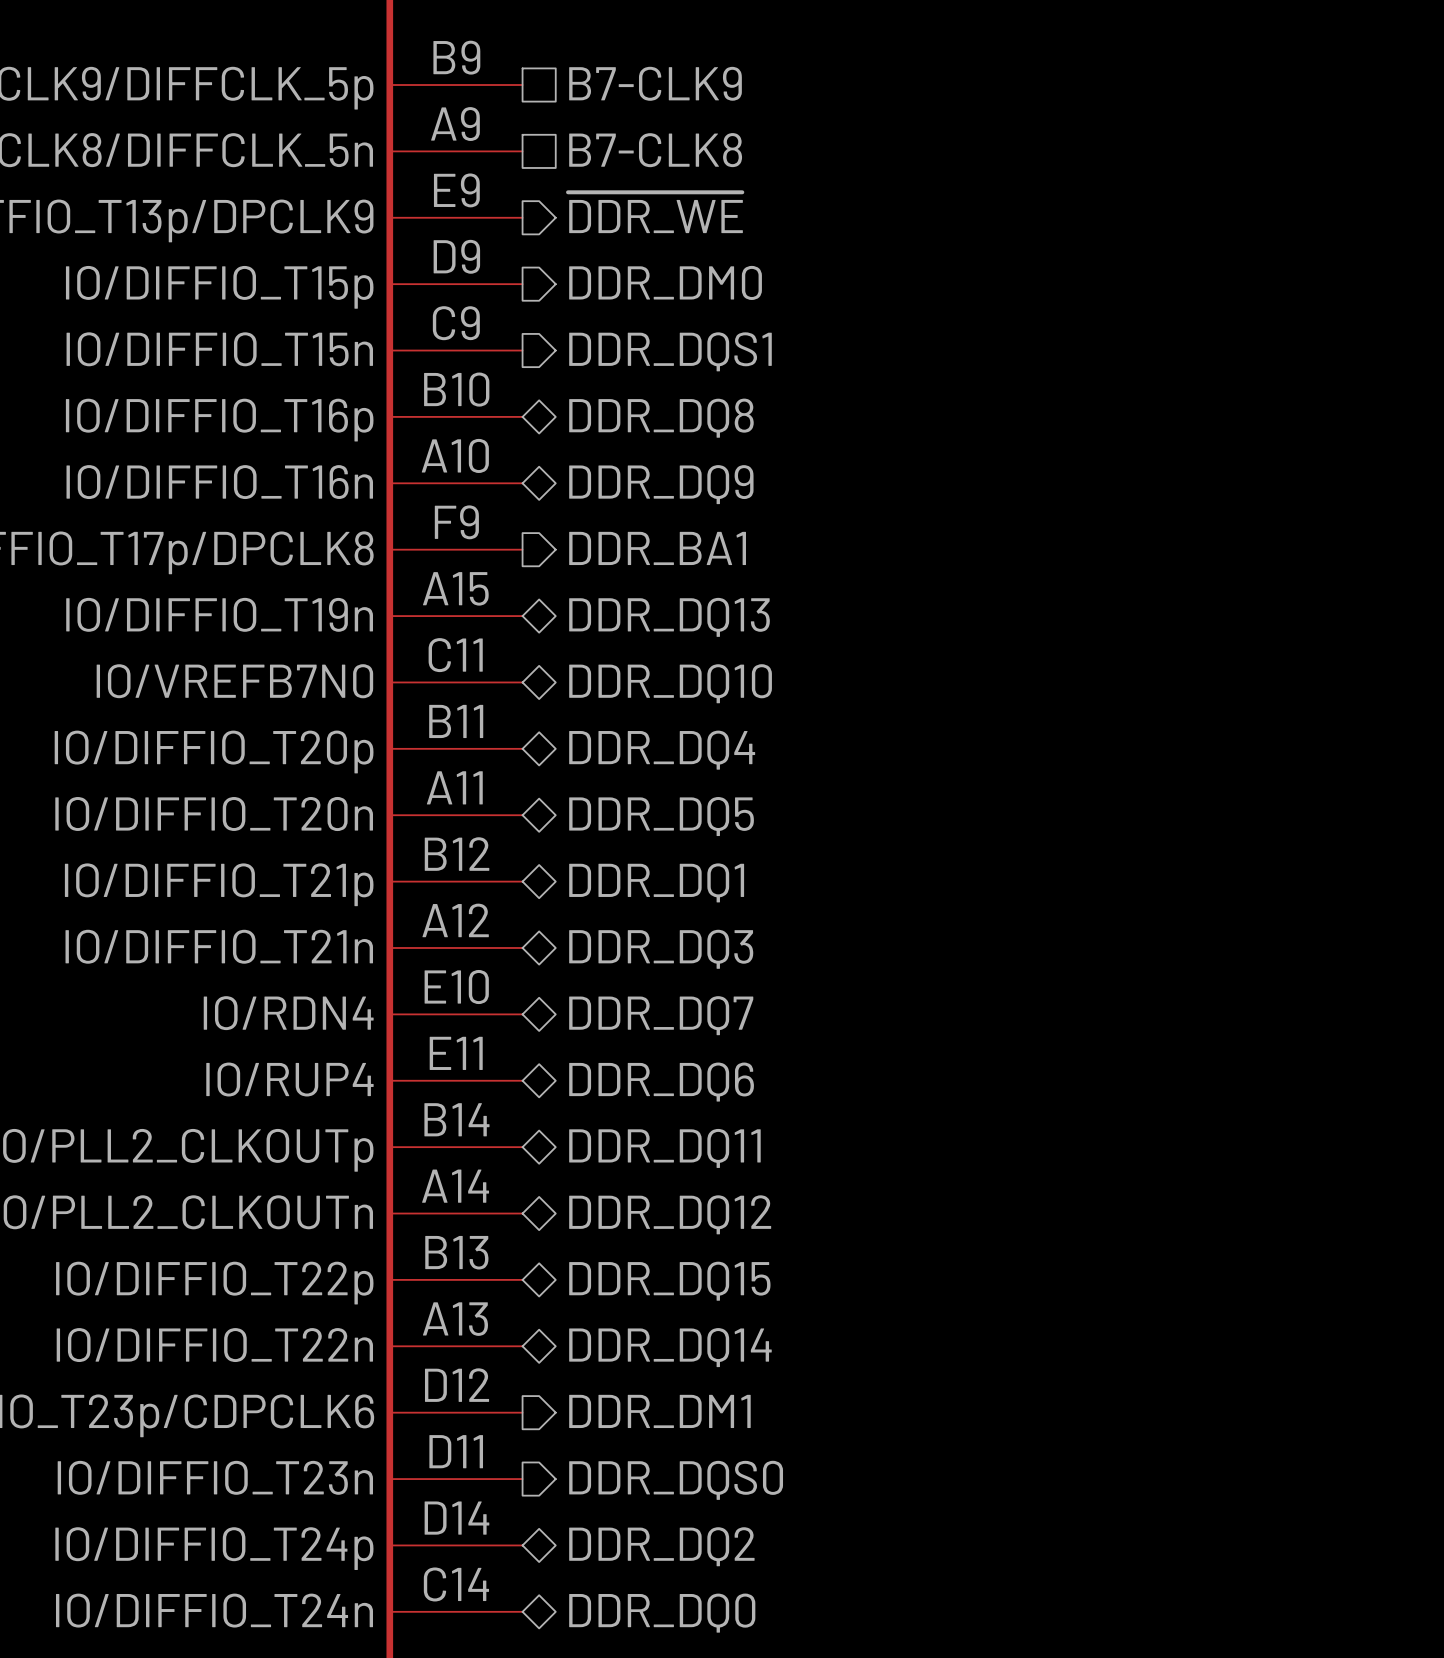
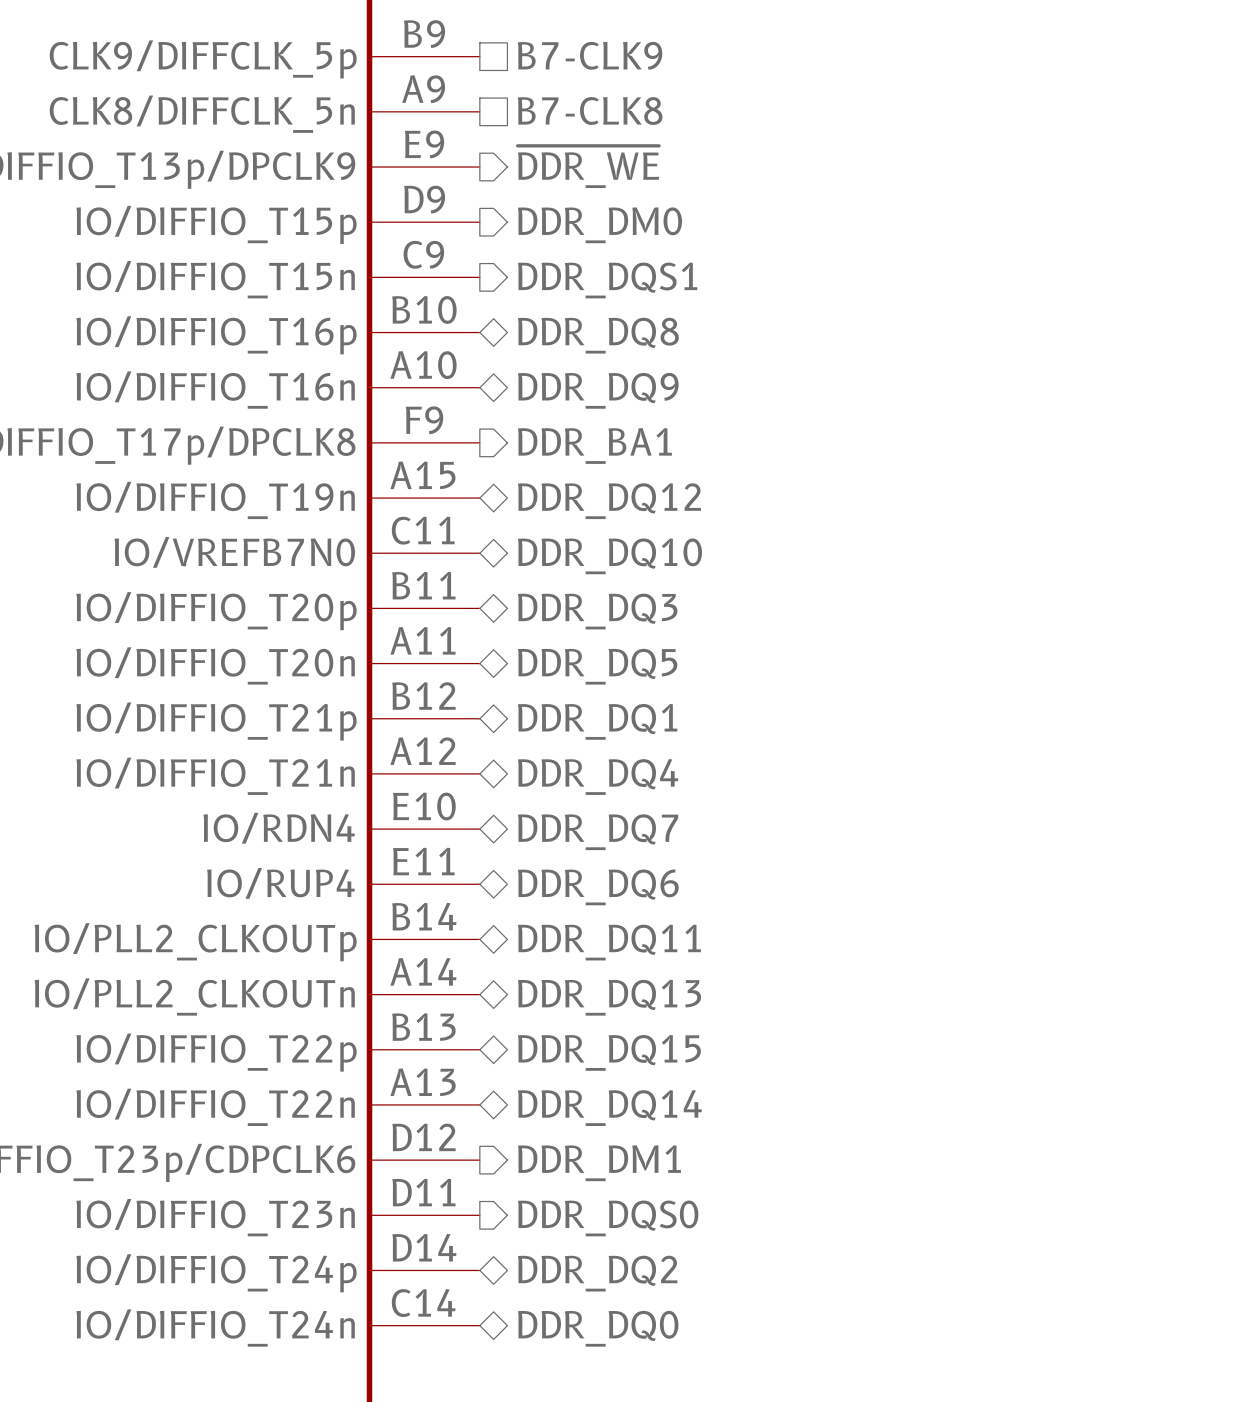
hierarchical label: DDR_DQ13 (669, 617) -> DDR_DQ12 (609, 501)
hierarchical label: DDR_DQ4 (662, 750) -> DDR_DQ3 (597, 611)
hierarchical label: DDR_DQ3 (661, 949) -> DDR_DQ4 (598, 777)
hierarchical label: DDR_DQ12 (670, 1214) -> DDR_DQ13 (609, 997)

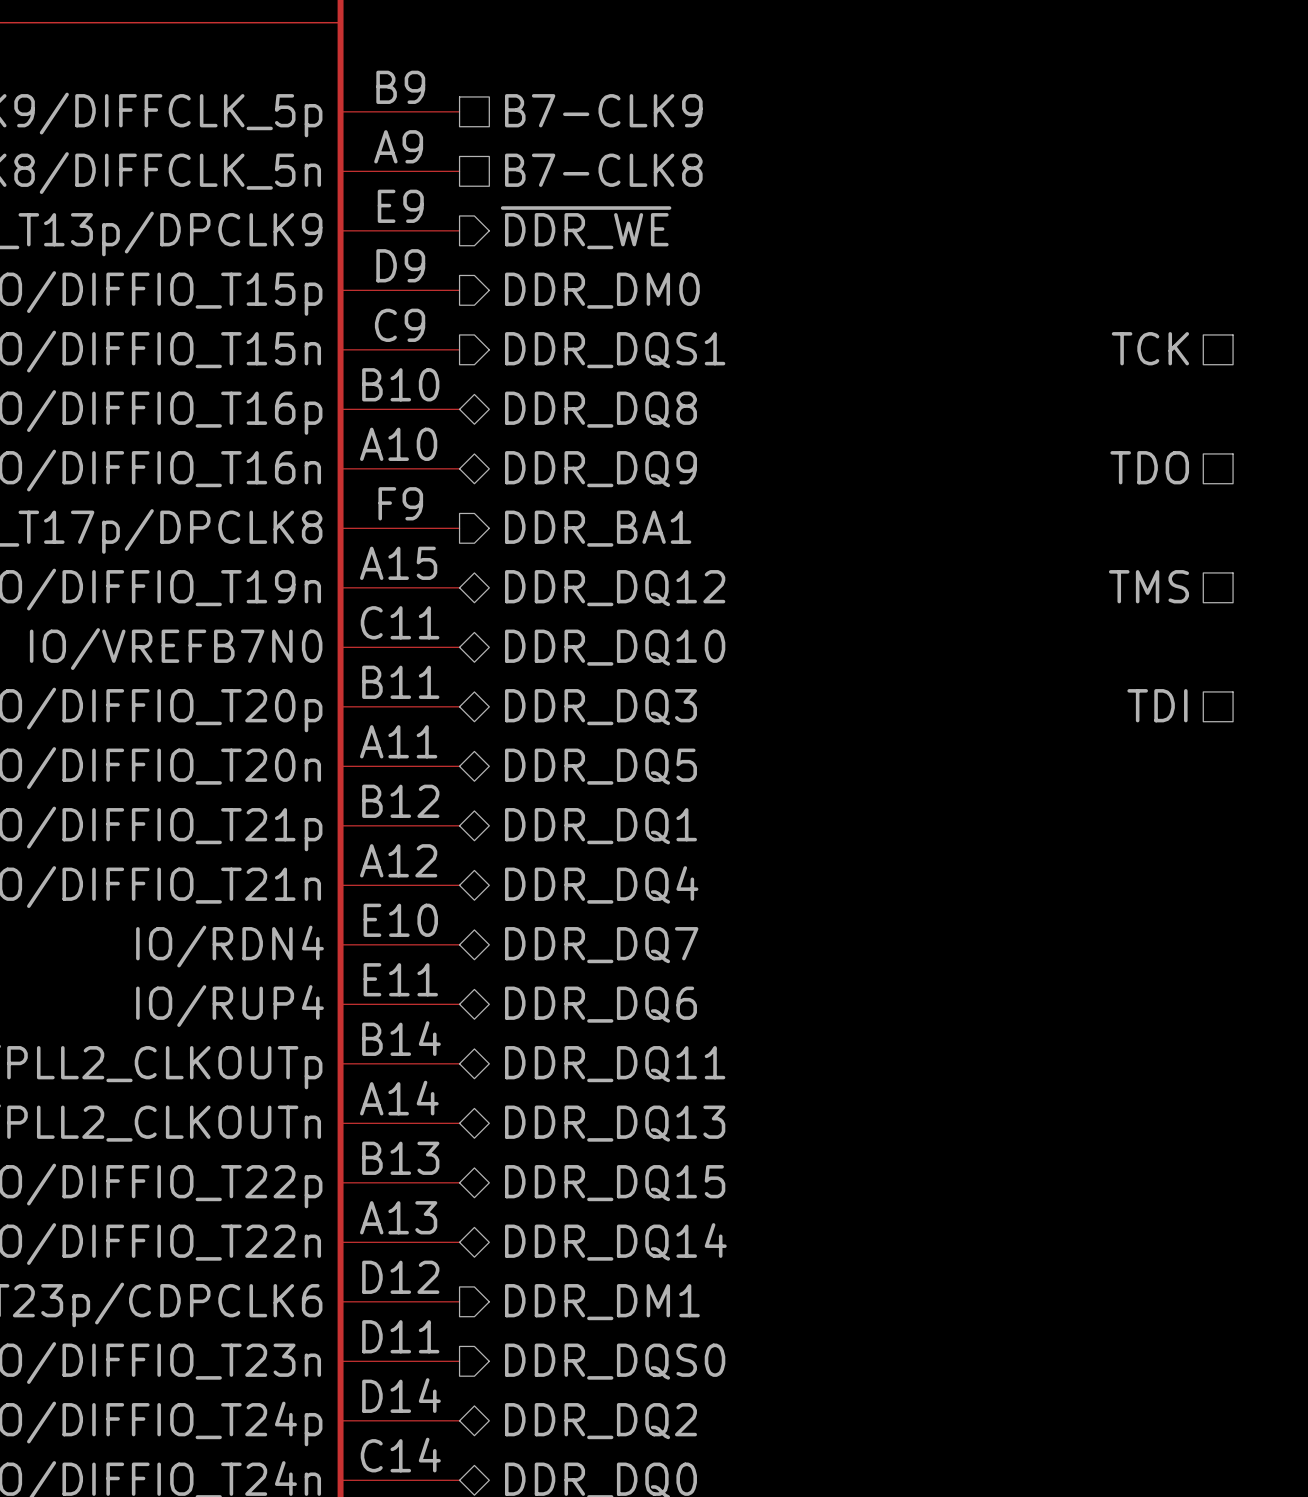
hierarchical label: none -> TCK (1150, 348)
hierarchical label: none -> TDO (1149, 467)
hierarchical label: none -> TMS (1148, 586)
hierarchical label: none -> TDI (1157, 705)

